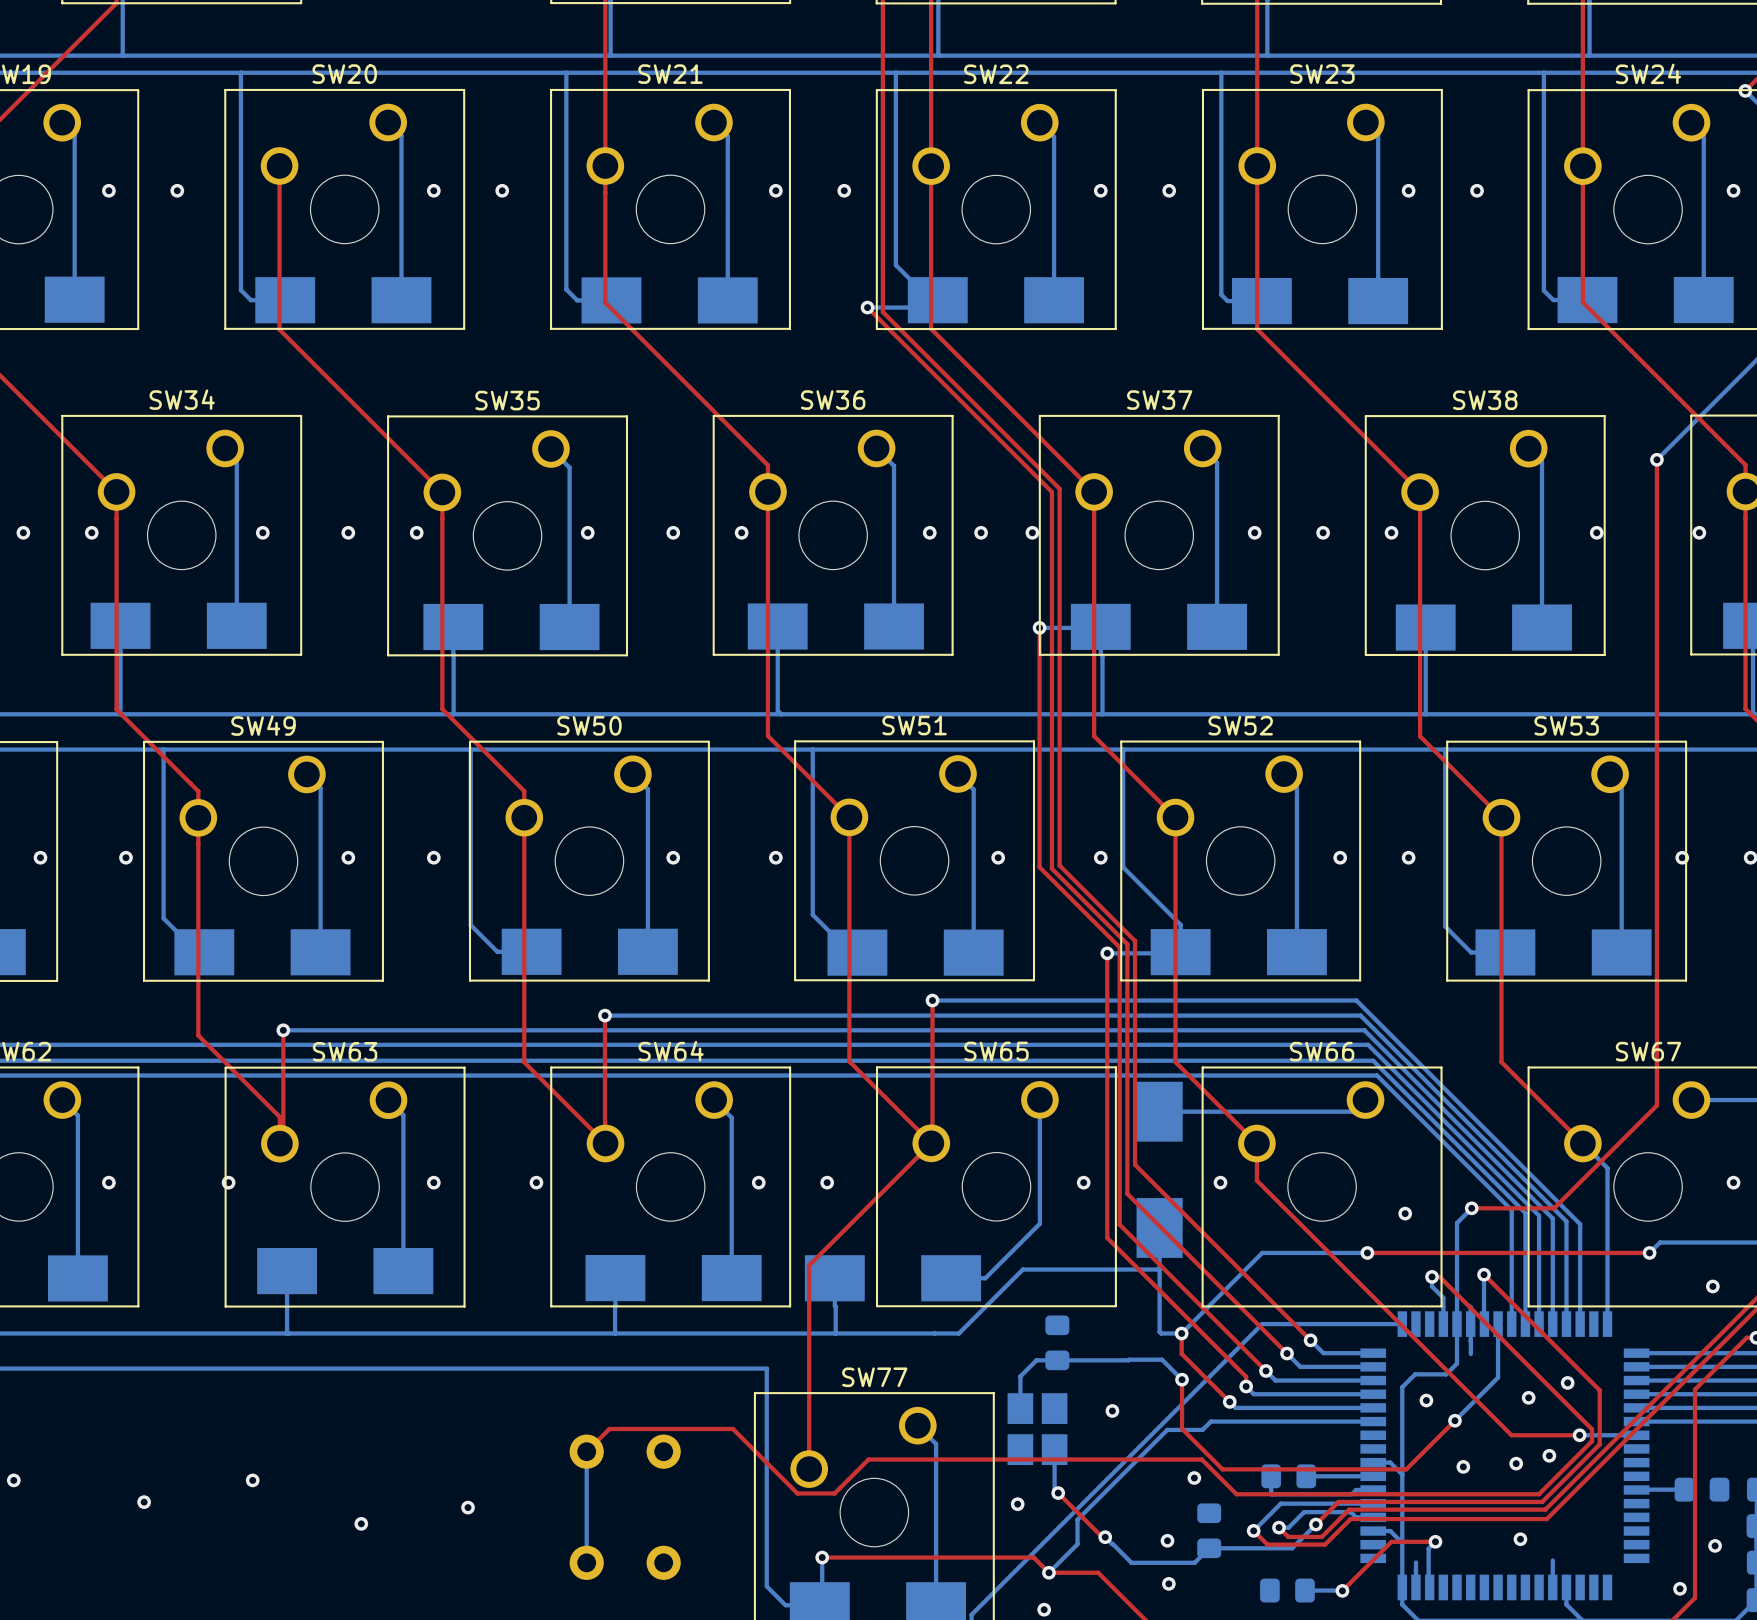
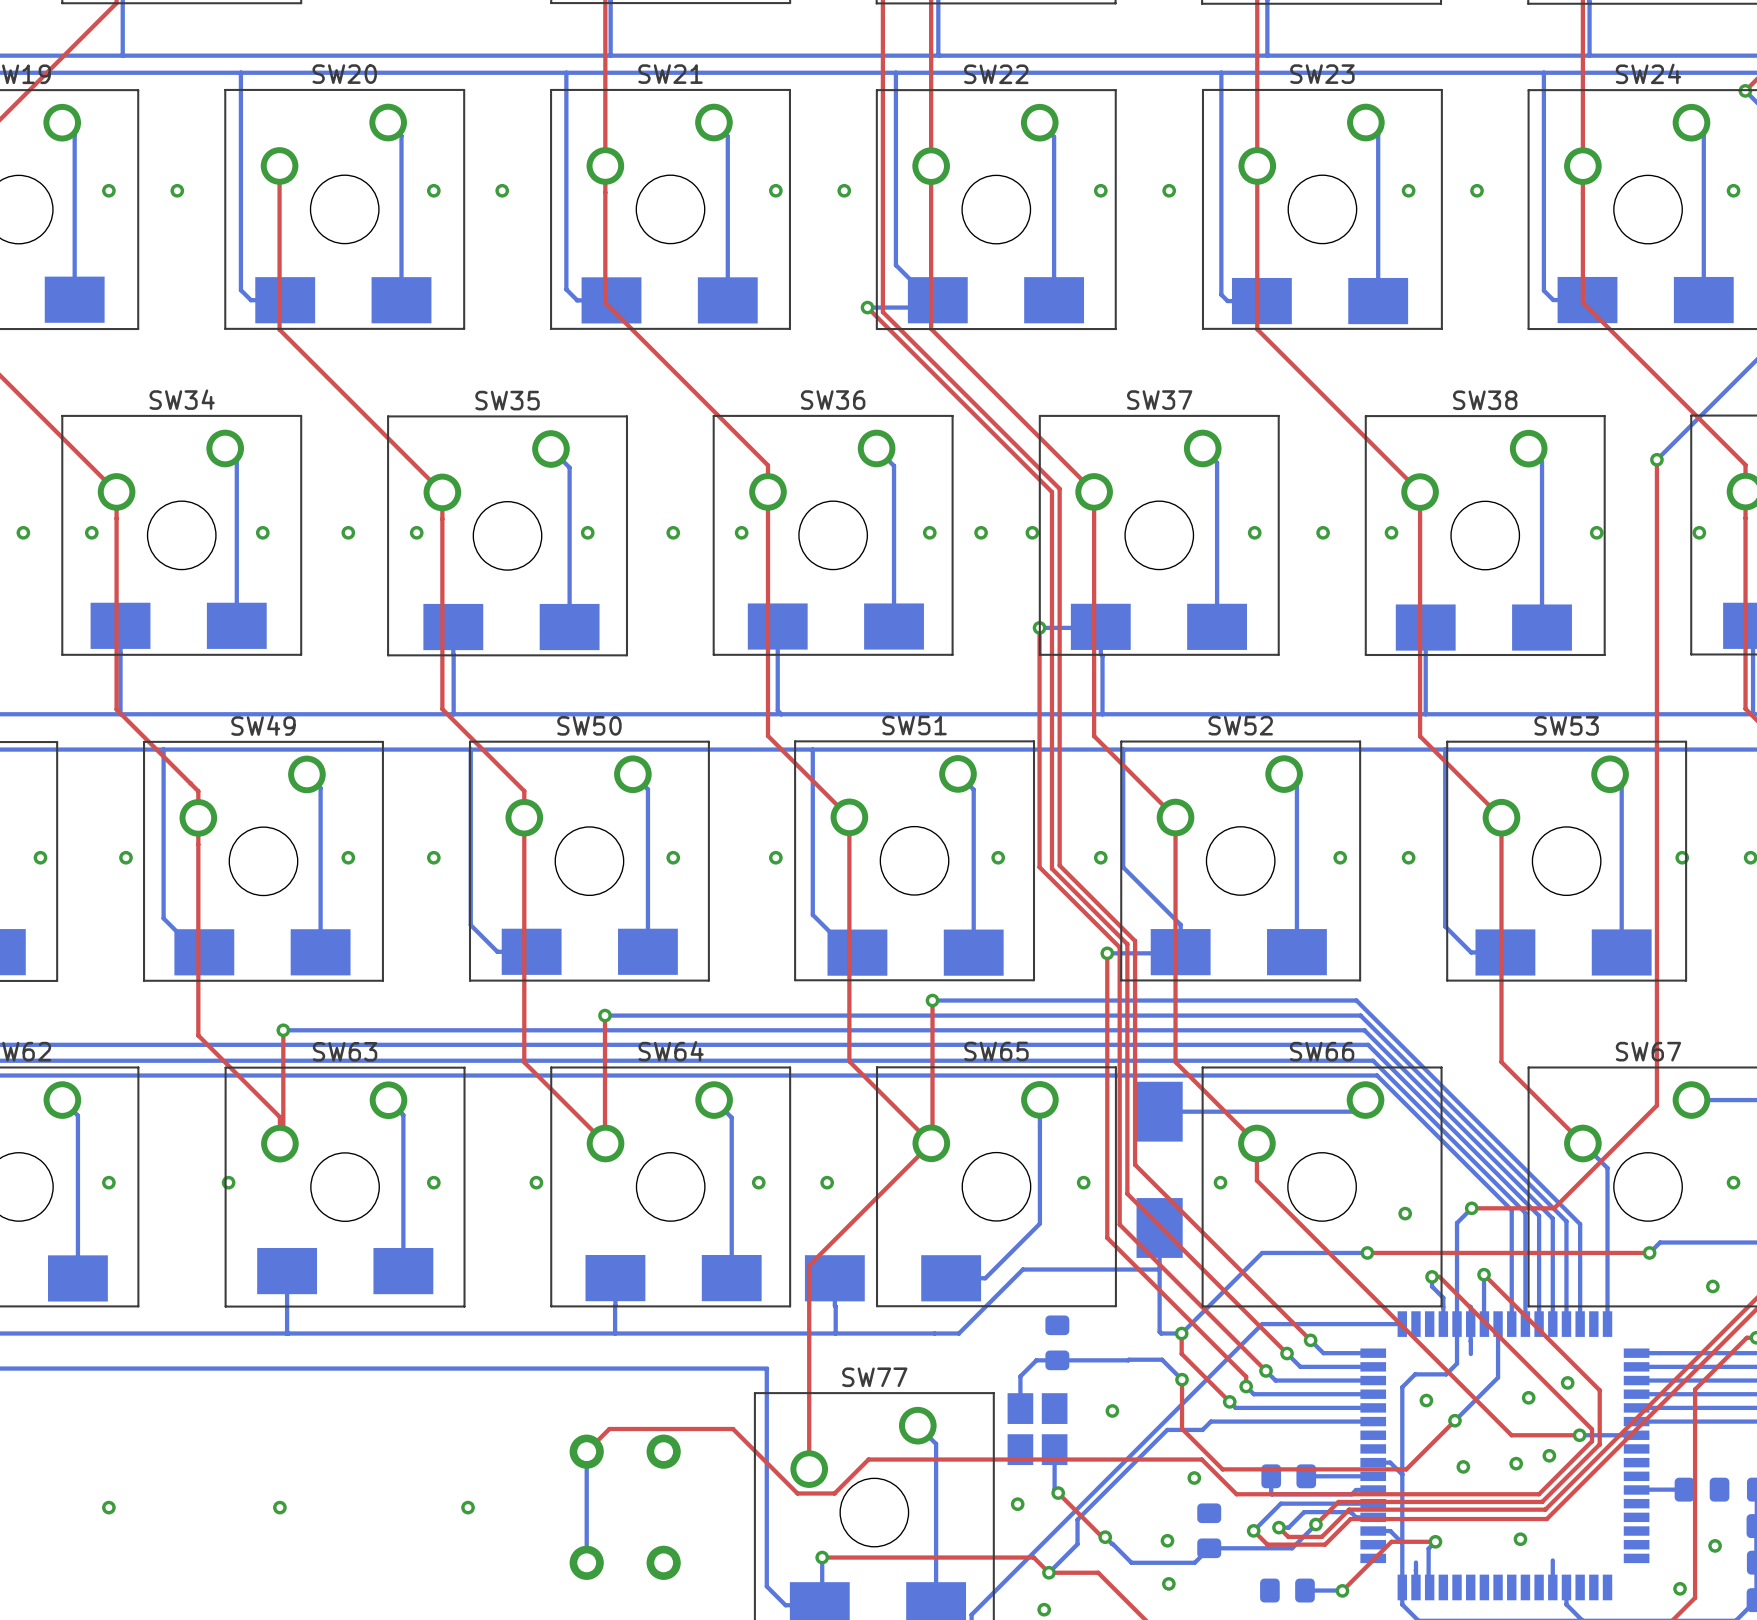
via: (13, 1480) -> none
via position: (252, 1480) -> (279, 1507)
via position: (144, 1502) -> (108, 1507)
via: (361, 1523) -> none

